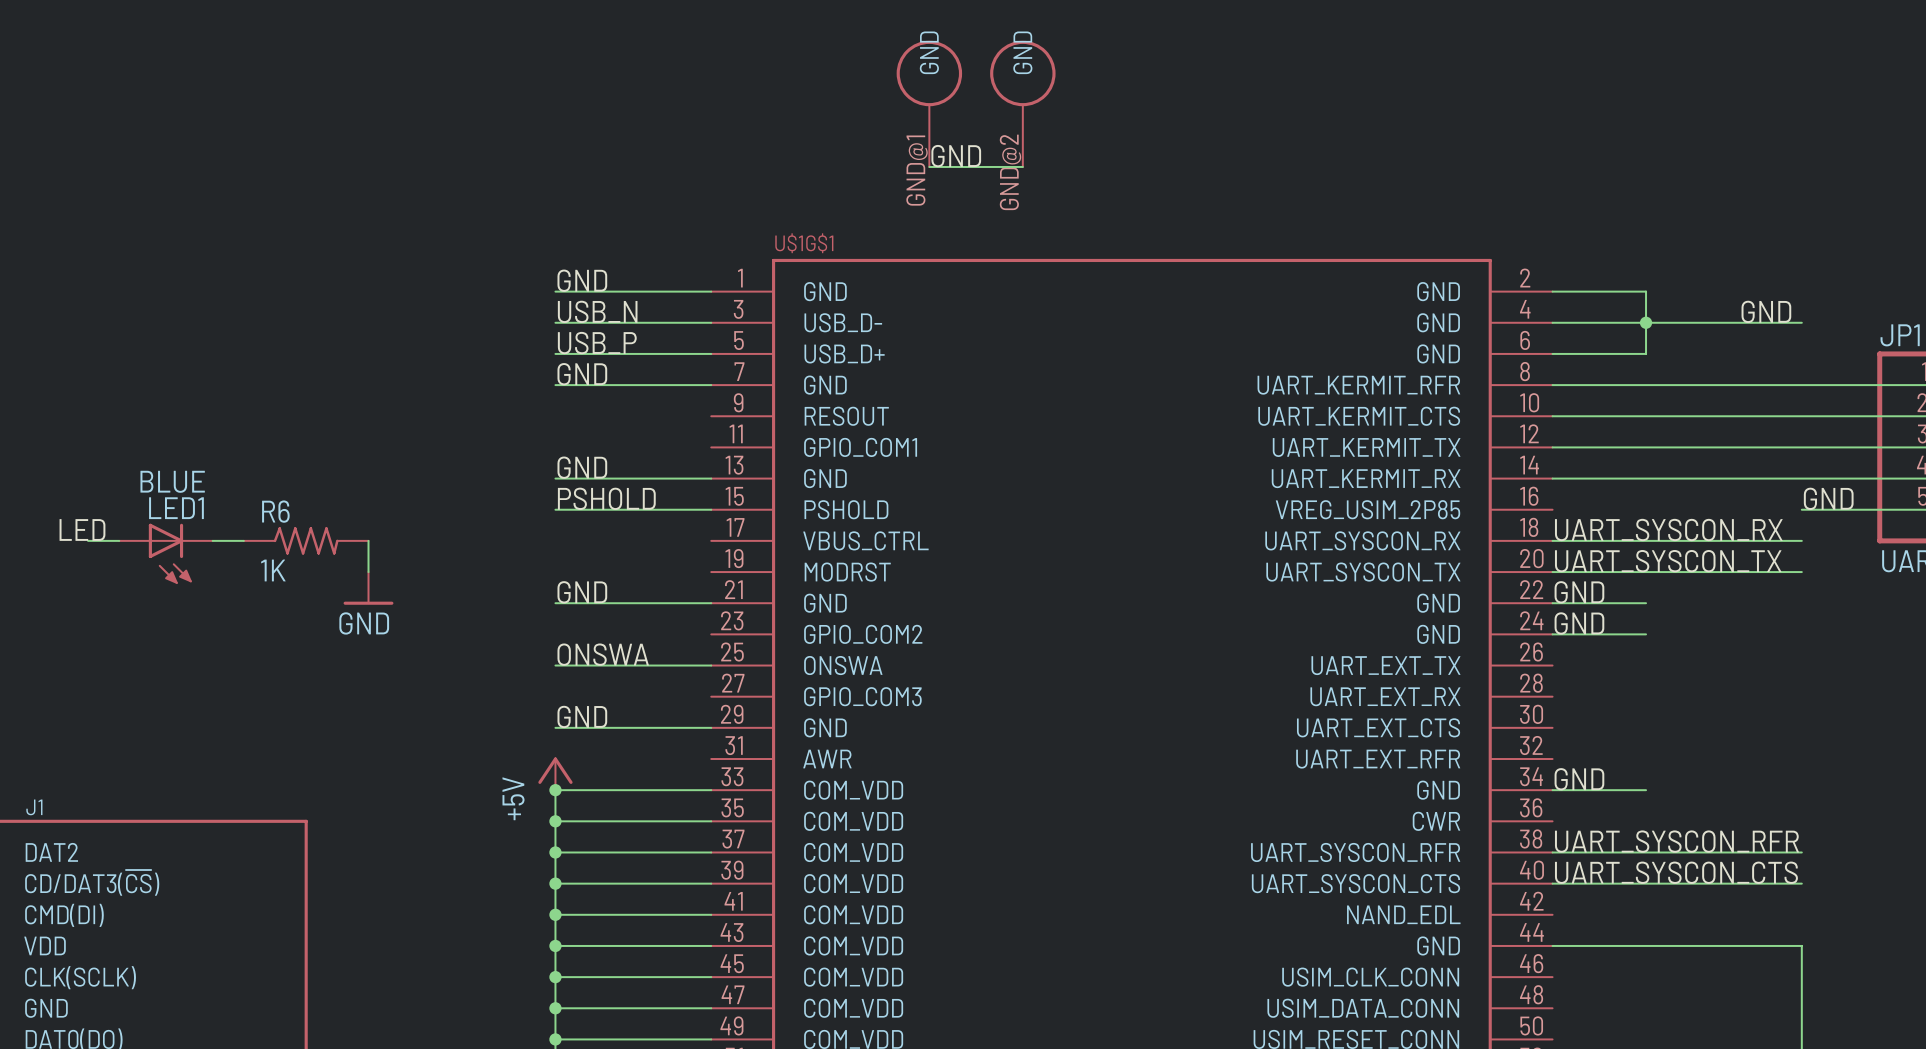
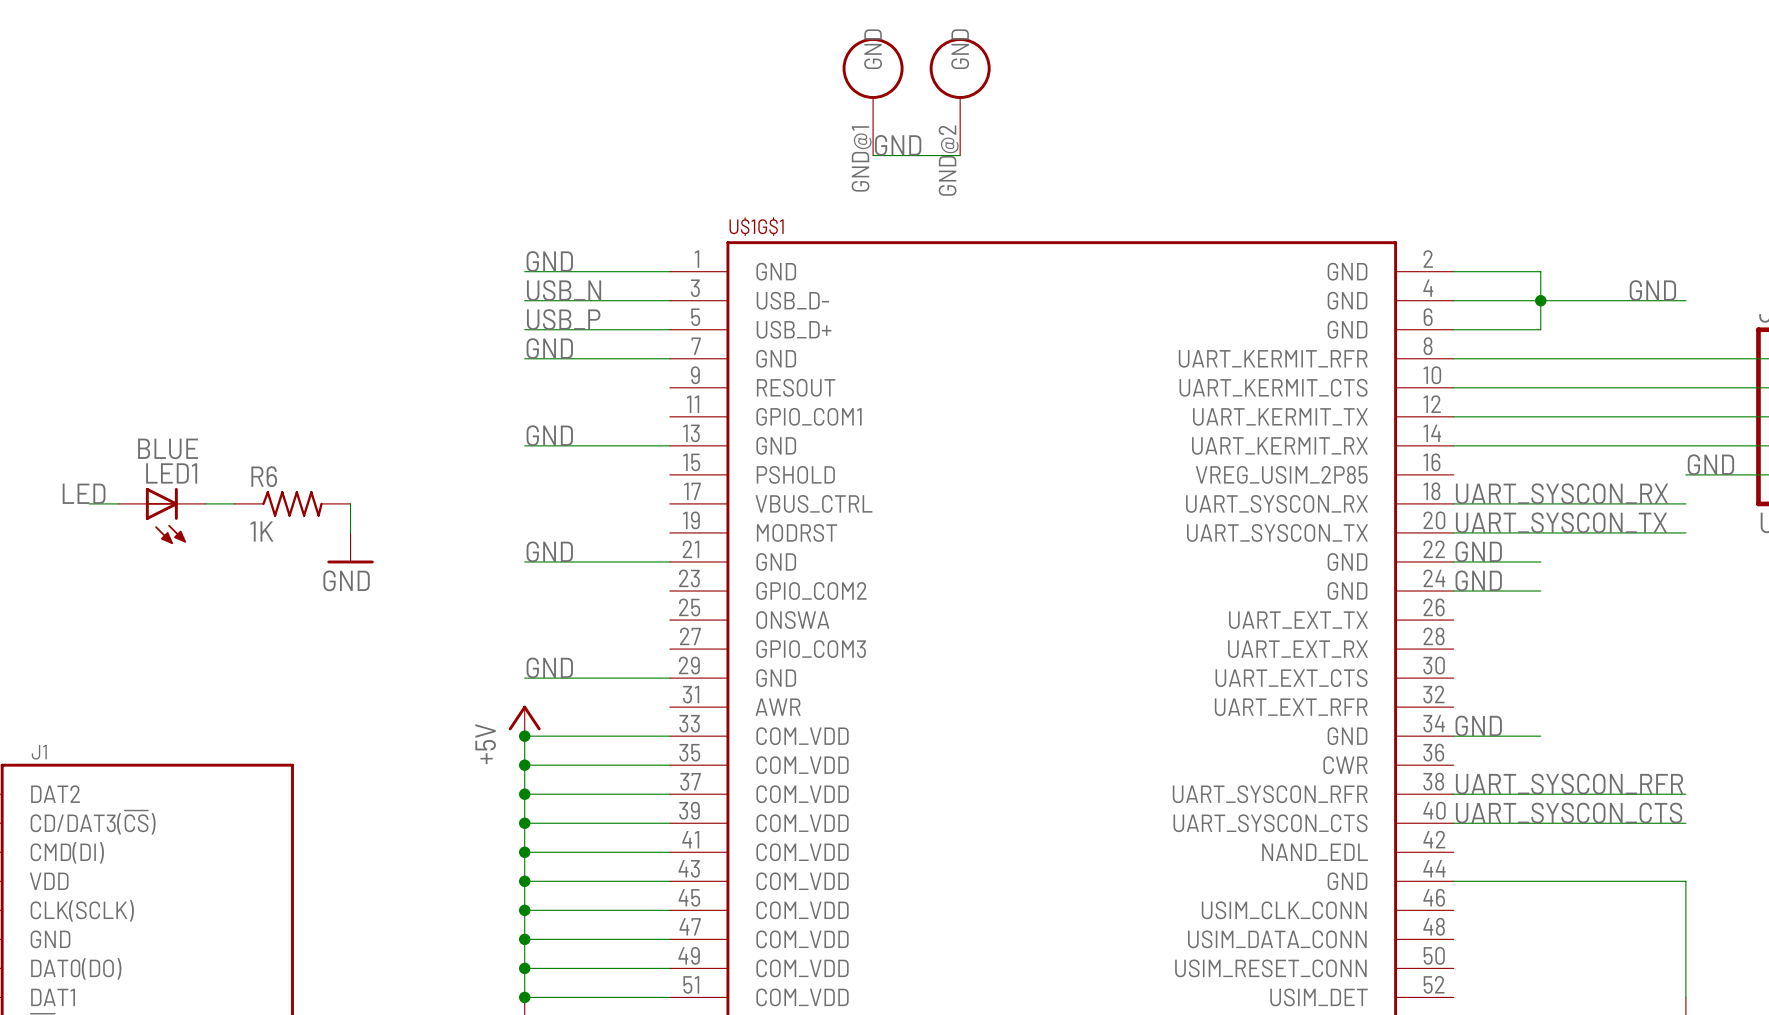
label: PSHOLD (606, 498) -> none
wire: (555, 509) (711, 509) -> none
label: ONSWA (603, 654) -> none
wire: (555, 665) (711, 665) -> none

